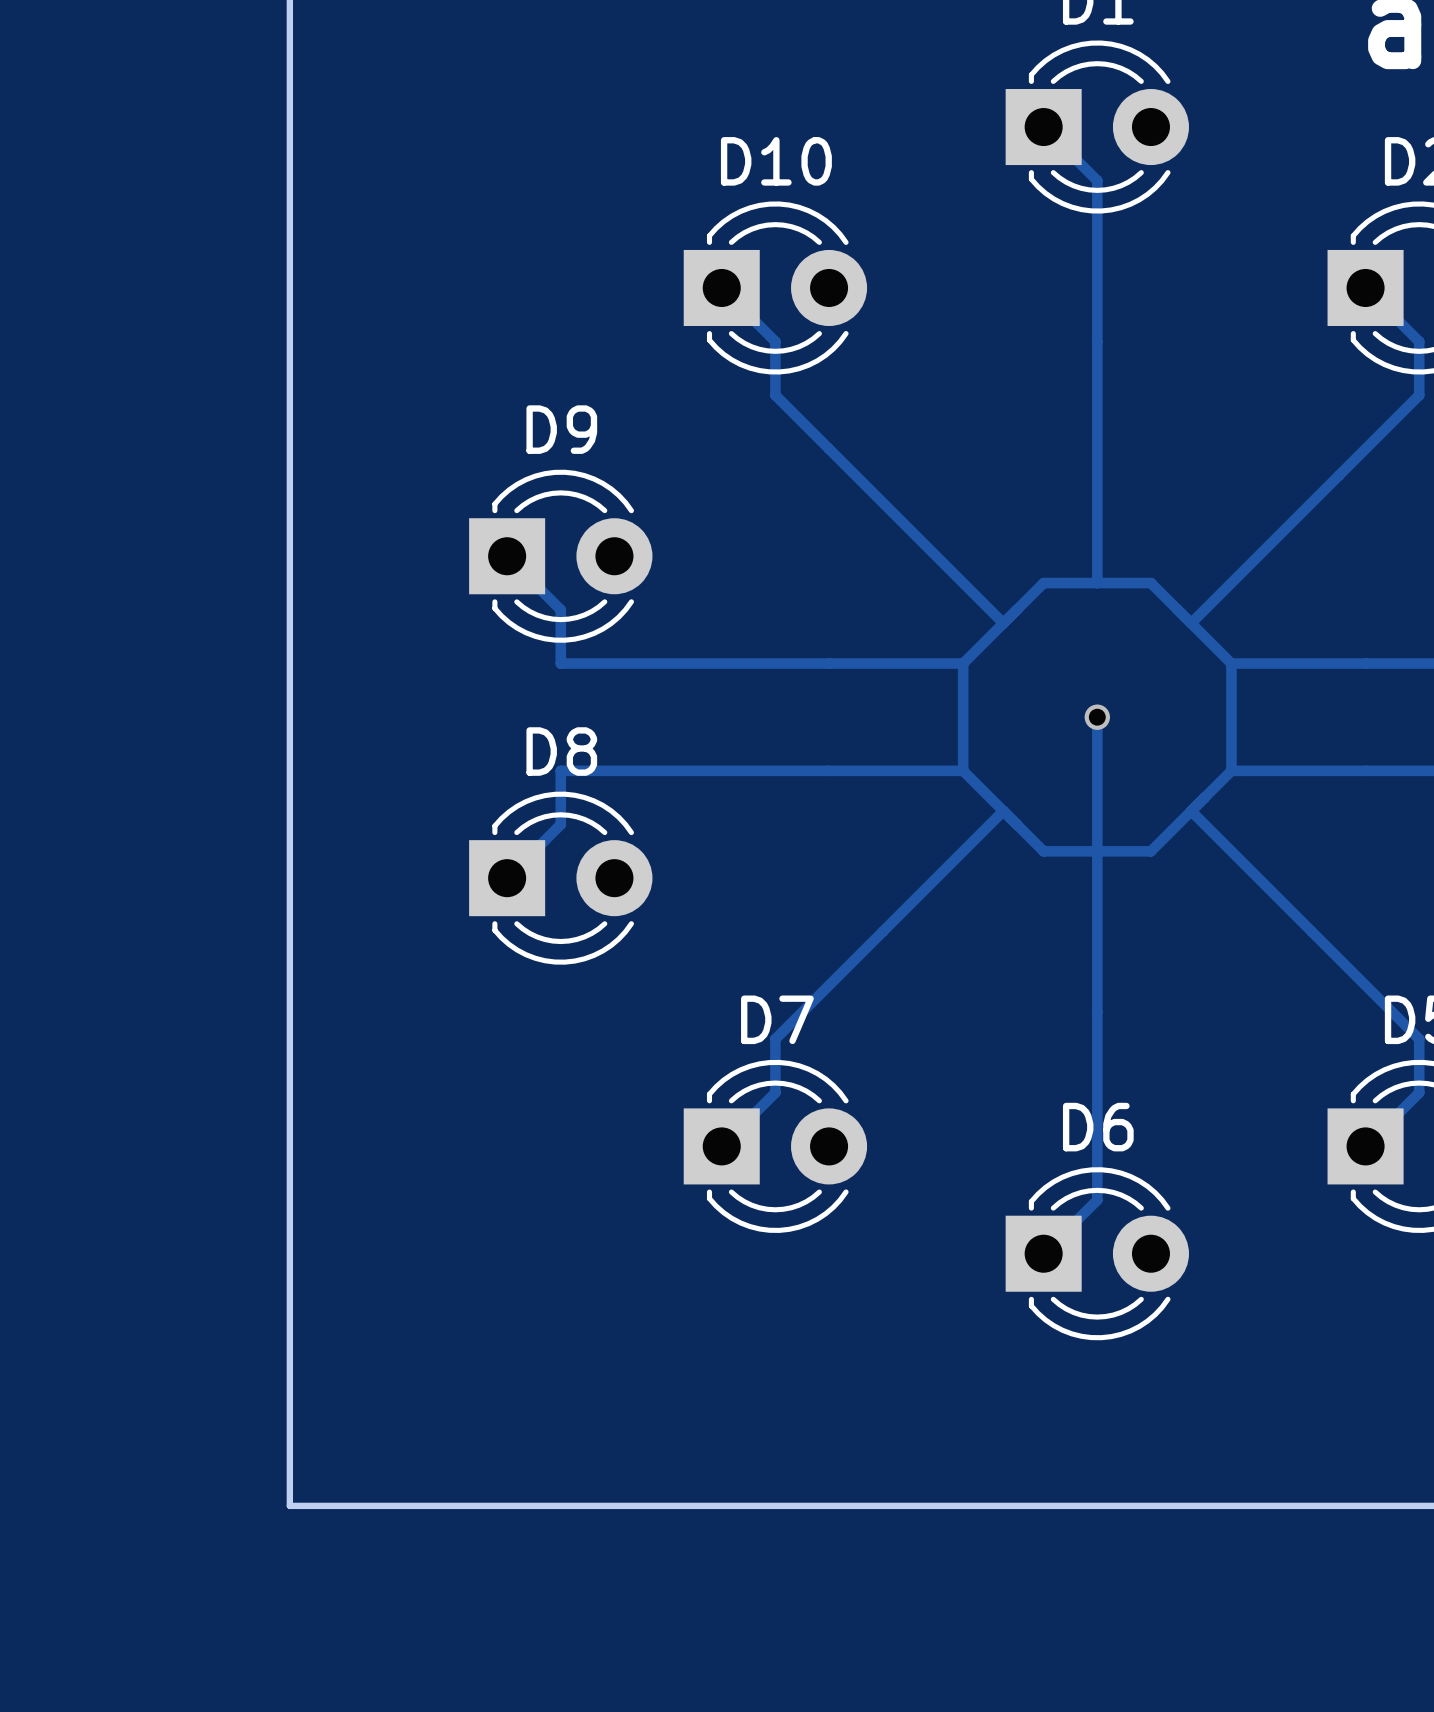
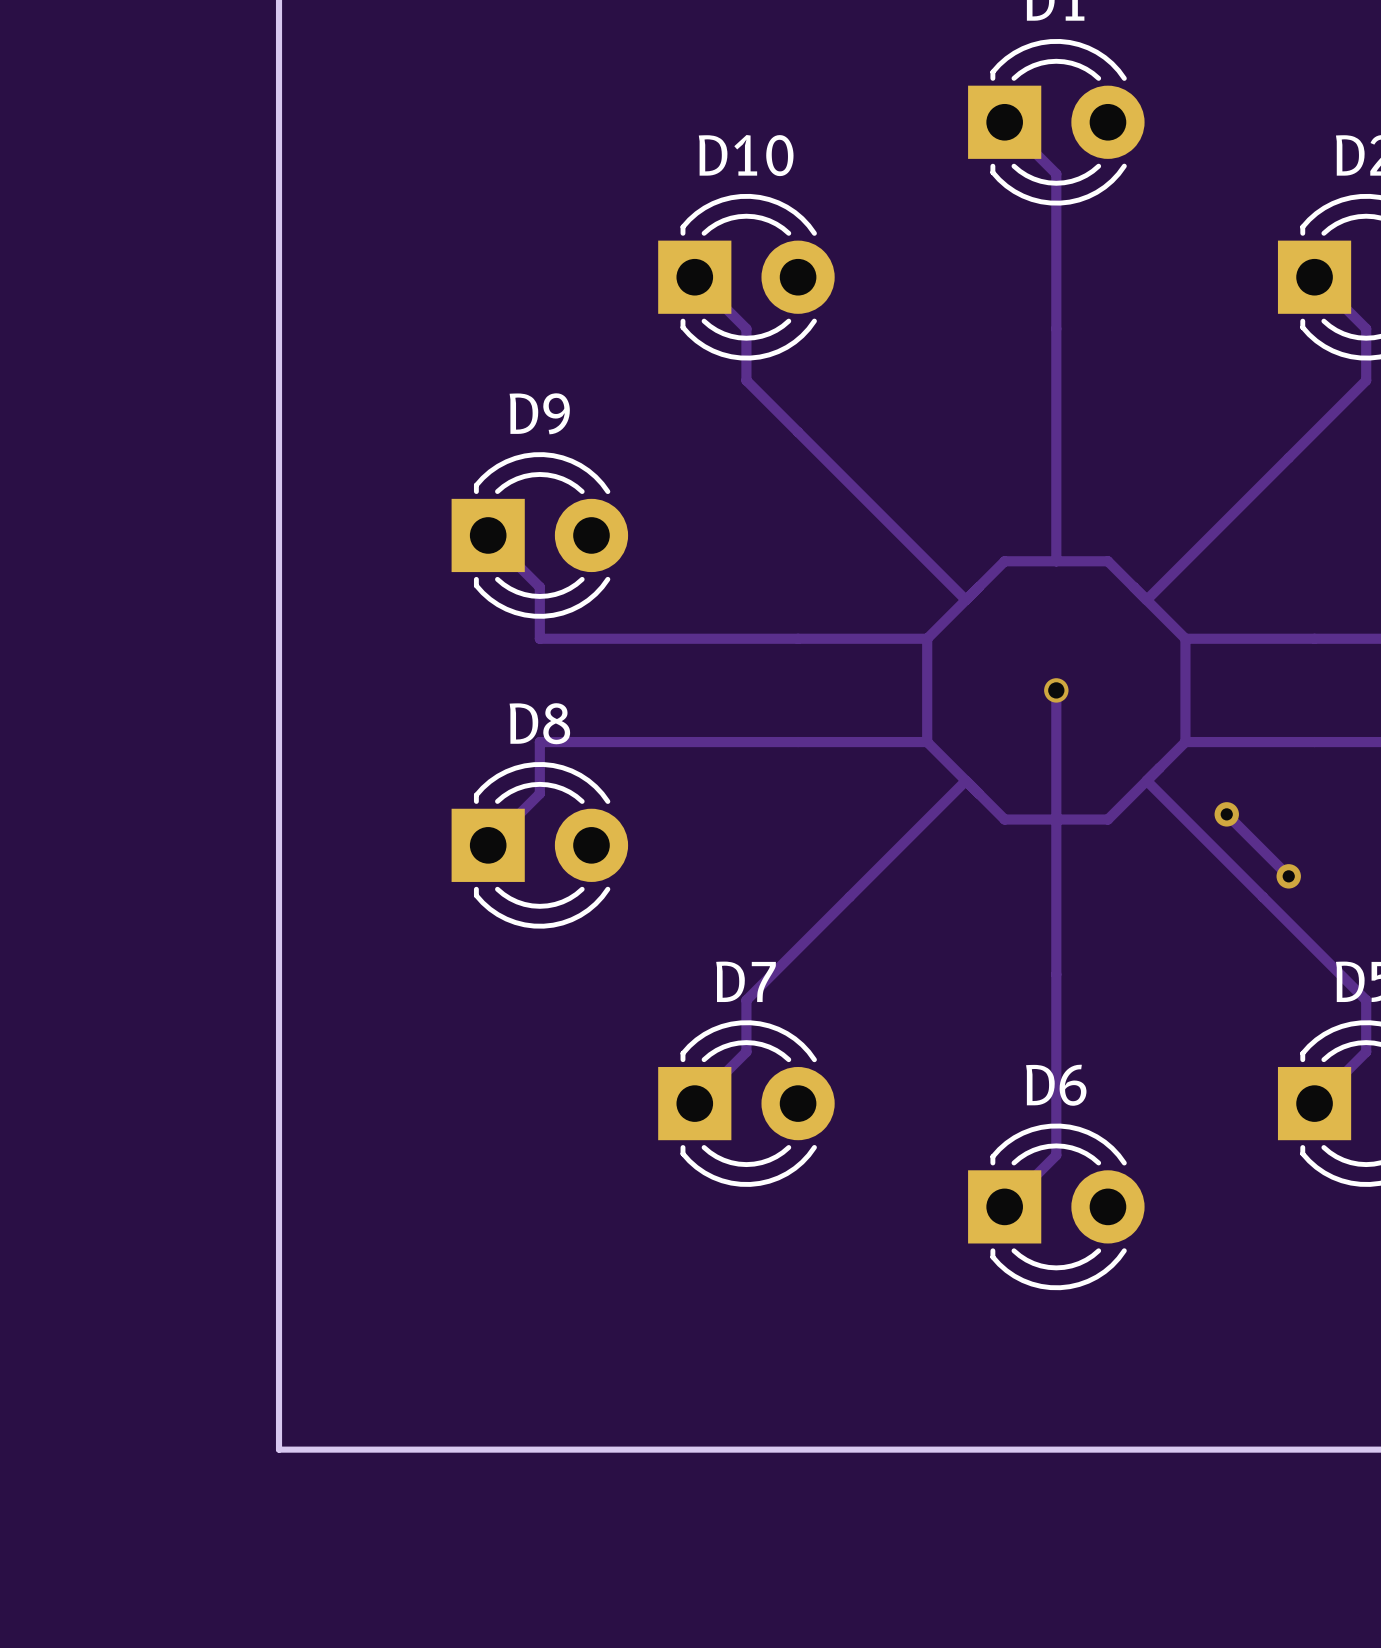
track: none -> (1226, 814) (1288, 876)
via: none -> (1226, 814)
via: none -> (1288, 876)

